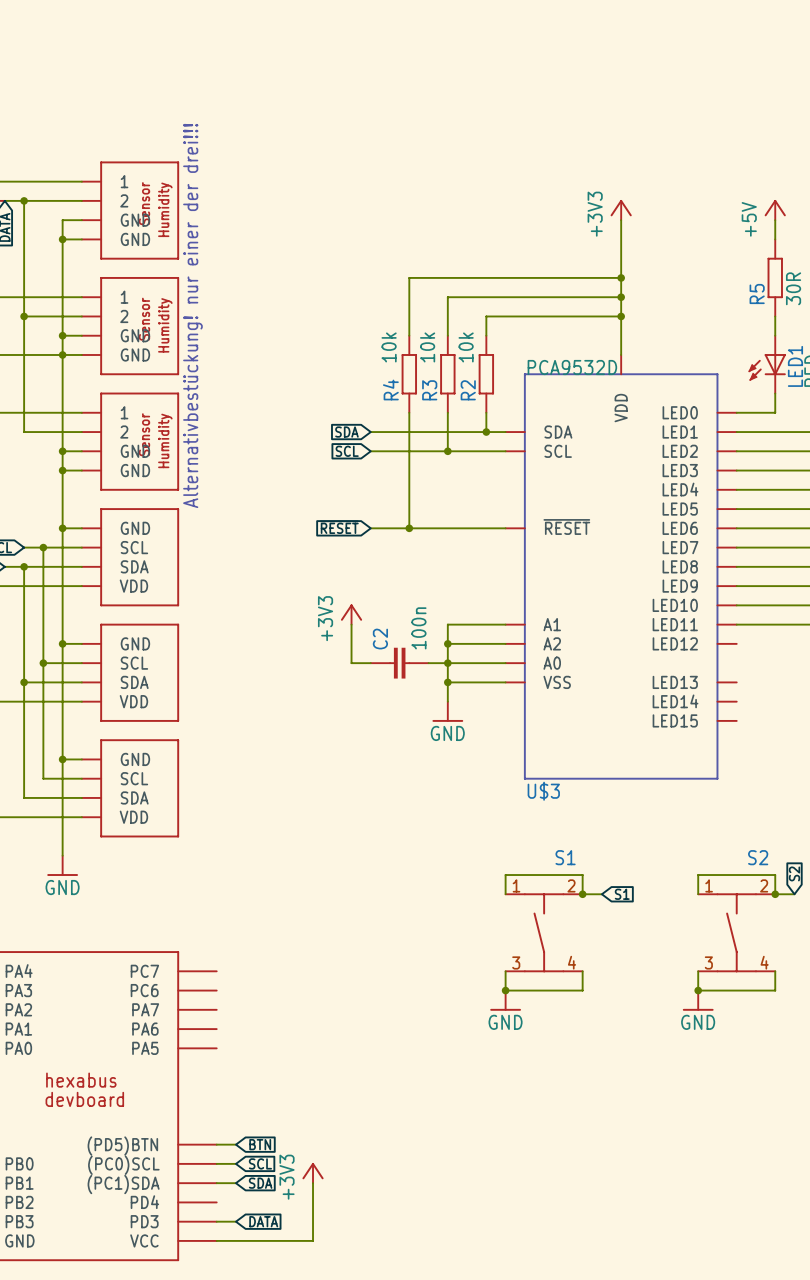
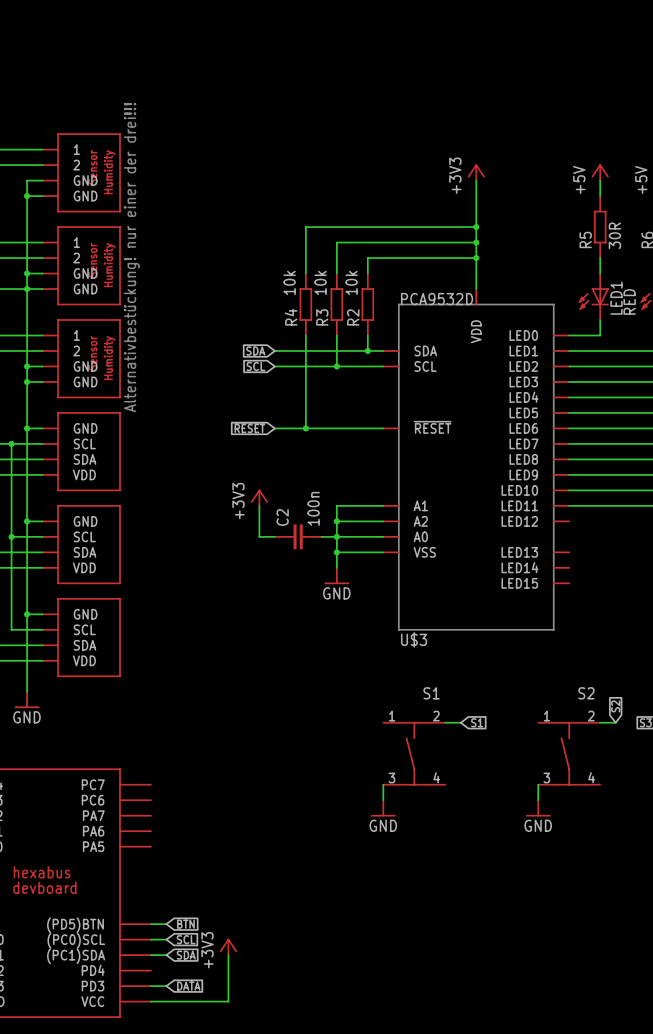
wire: (505, 894) (505, 875) (582, 875) (582, 894) -> none
junction: (582, 894) -> none
wire: (698, 894) (698, 875) (775, 875) (775, 894) -> none
junction: (775, 894) -> none
wire: (582, 971) (582, 990) (505, 990) -> none
wire: (775, 971) (775, 990) (698, 990) -> none
junction: (505, 990) -> none
junction: (698, 990) -> none

